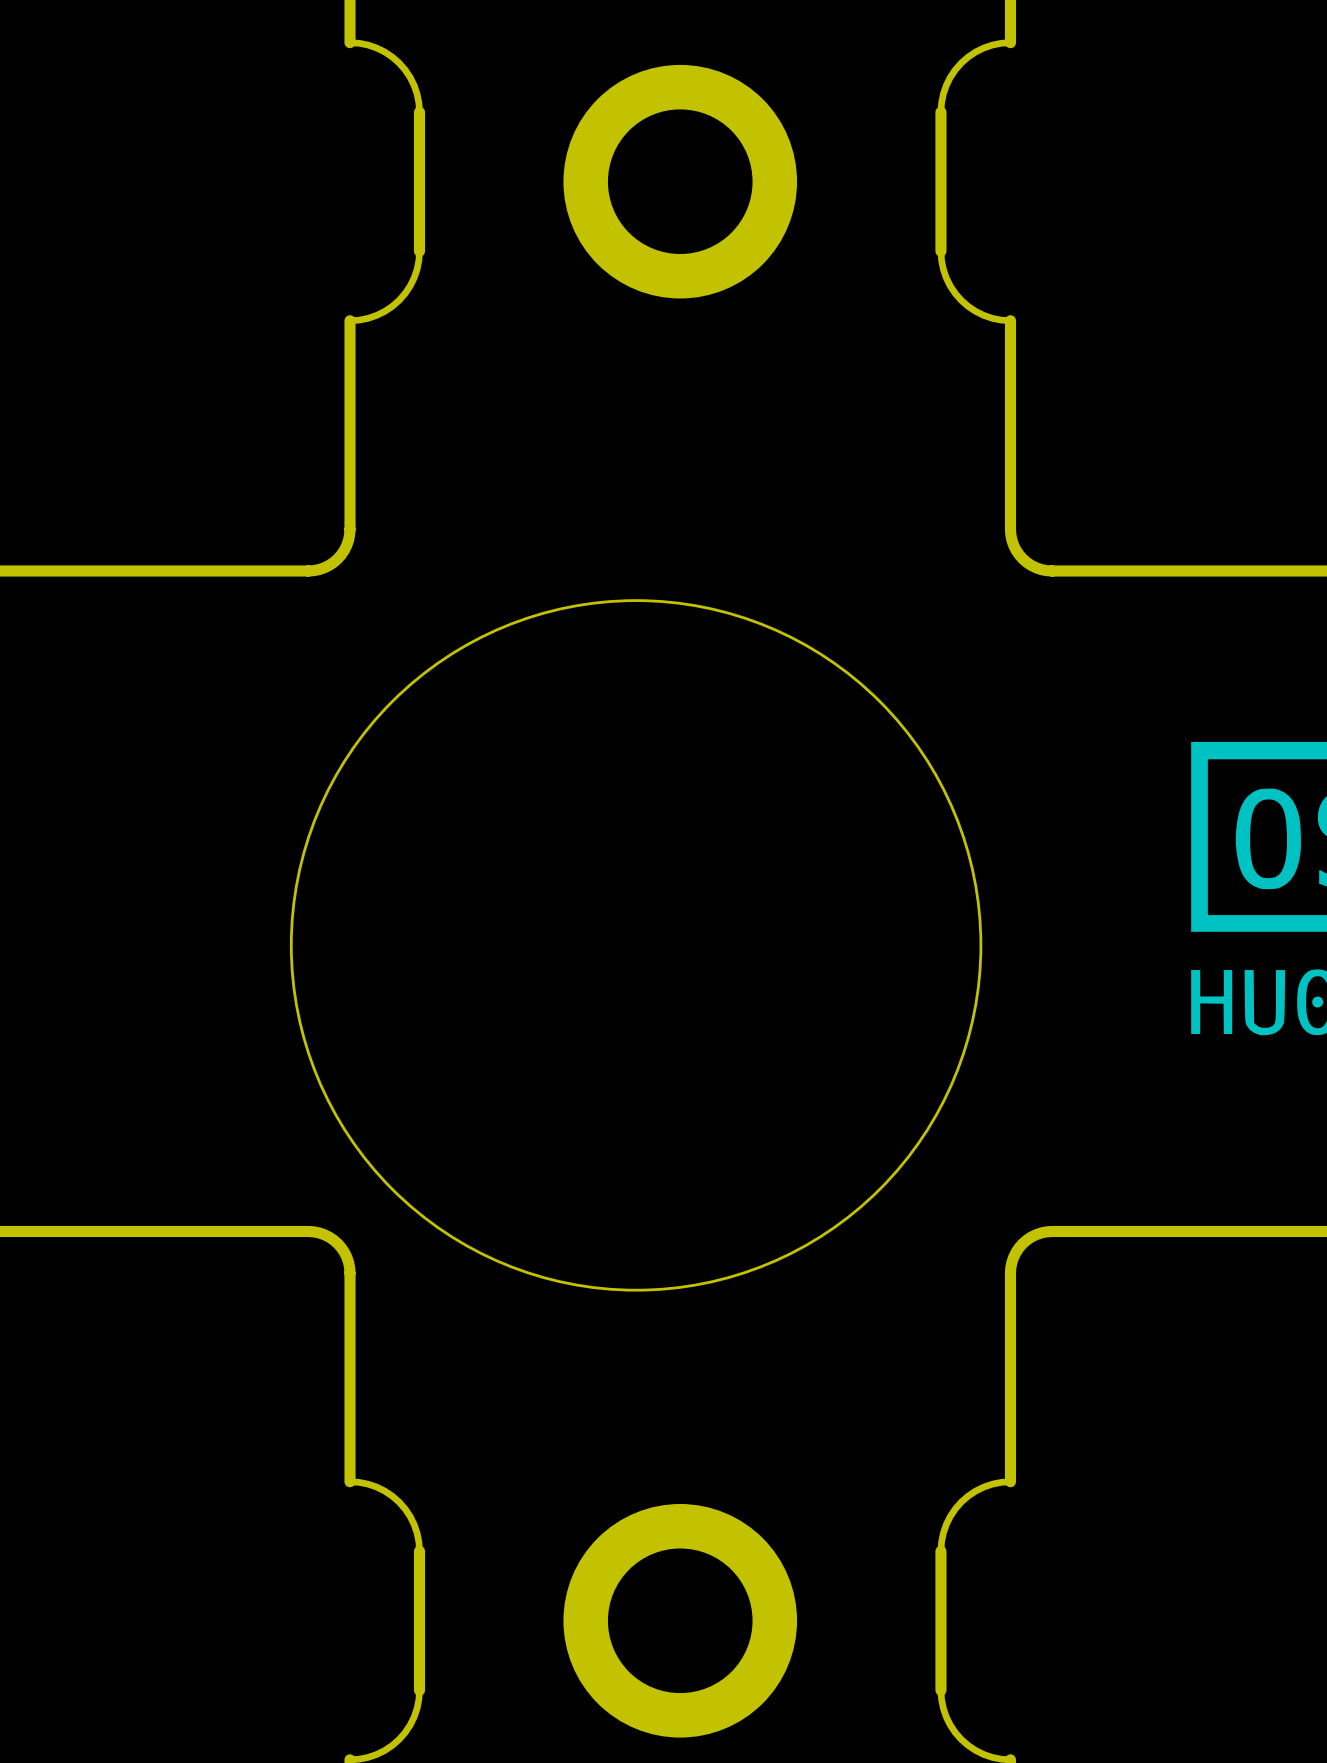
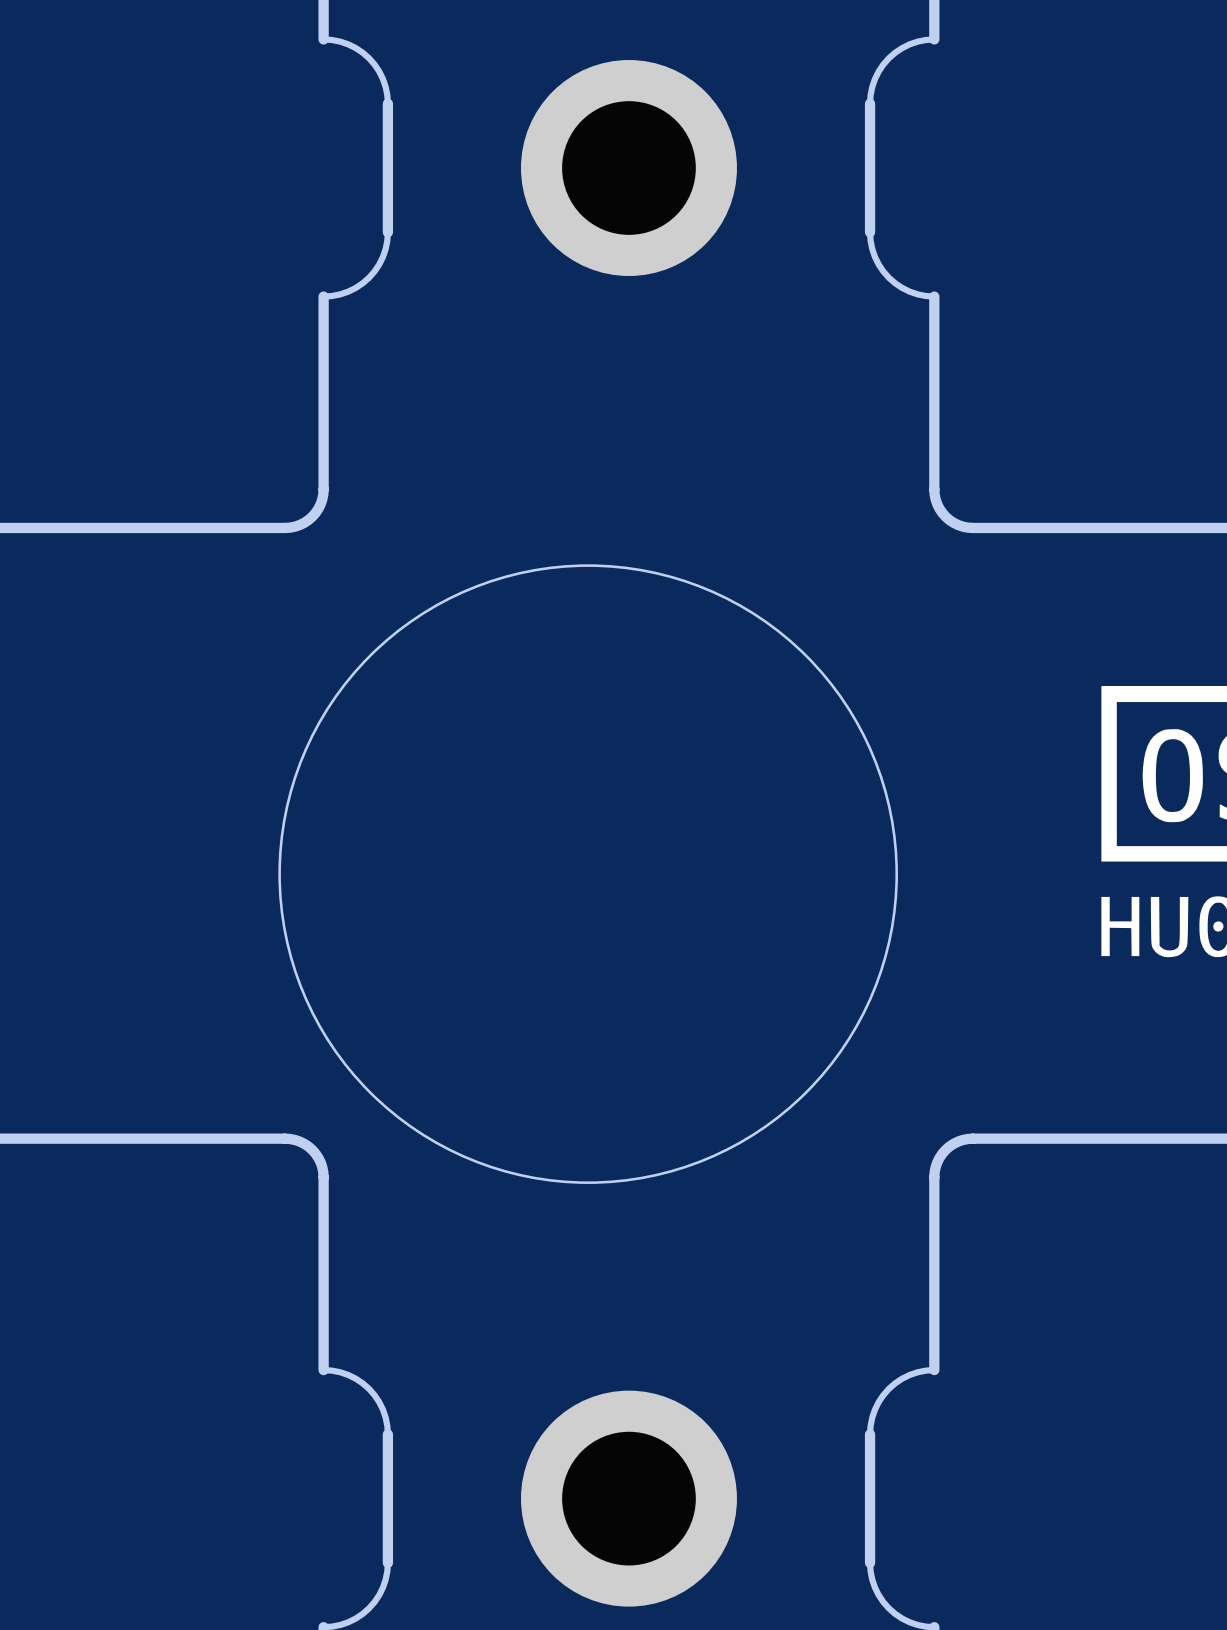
round board edge size: [289, 599, 983, 1292] -> [278, 564, 898, 1184]

